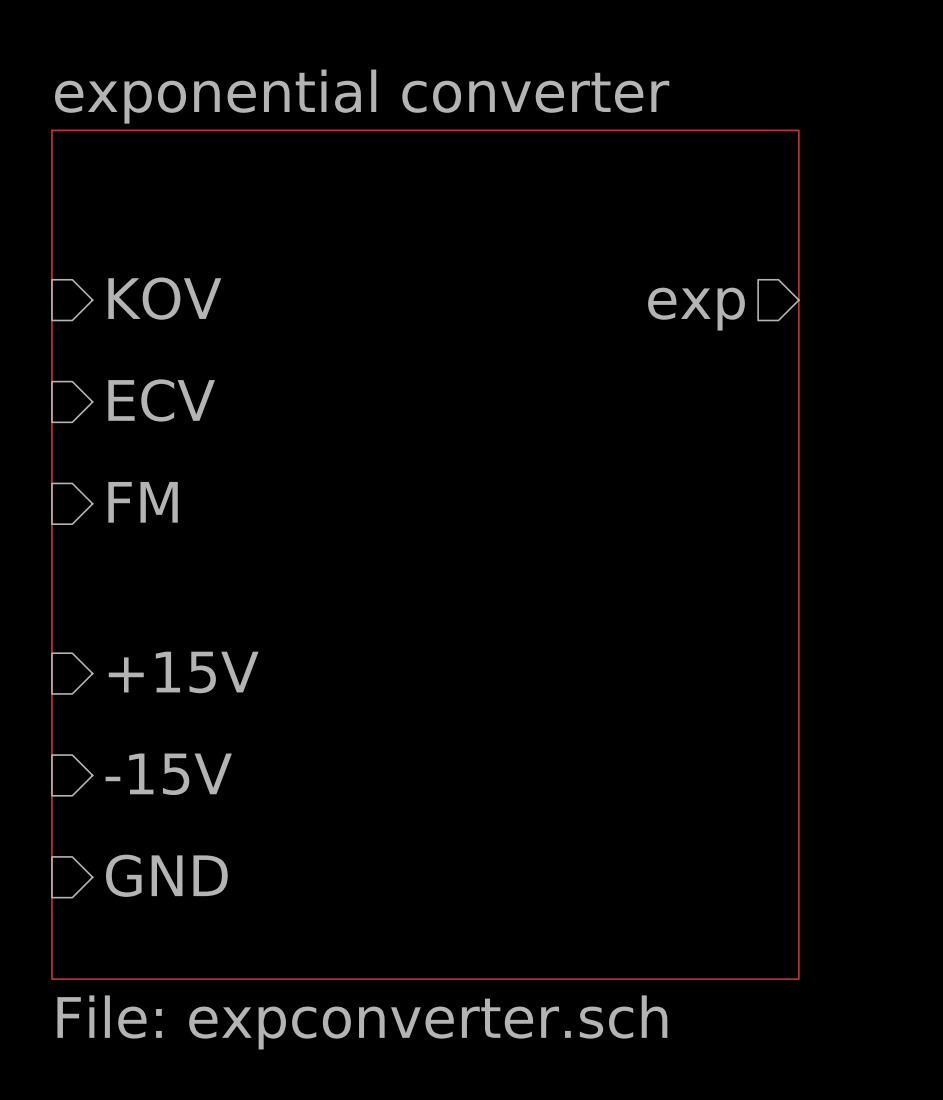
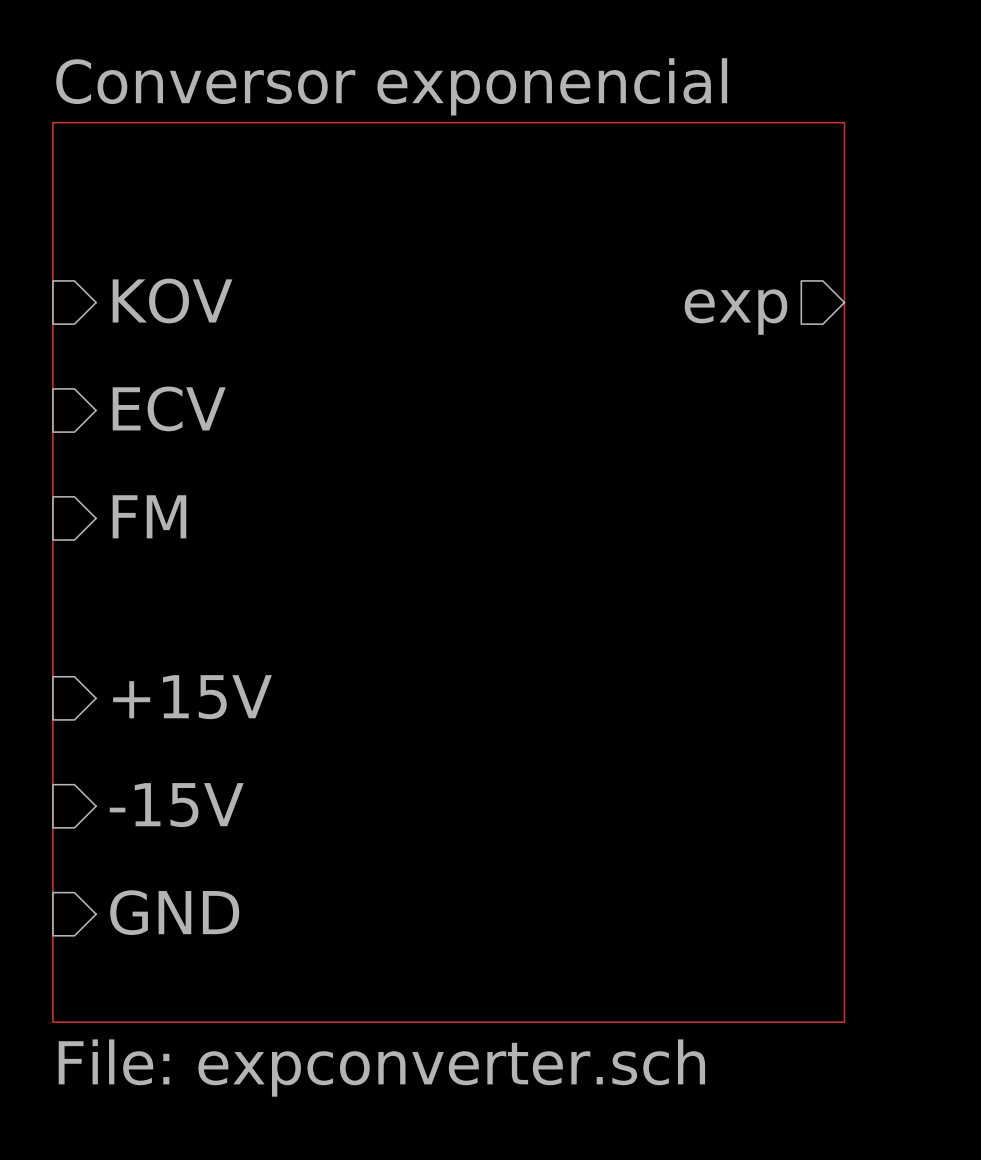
sheet exponential converter name: exponential converter (362, 96) -> Conversor exponencial (391, 86)

